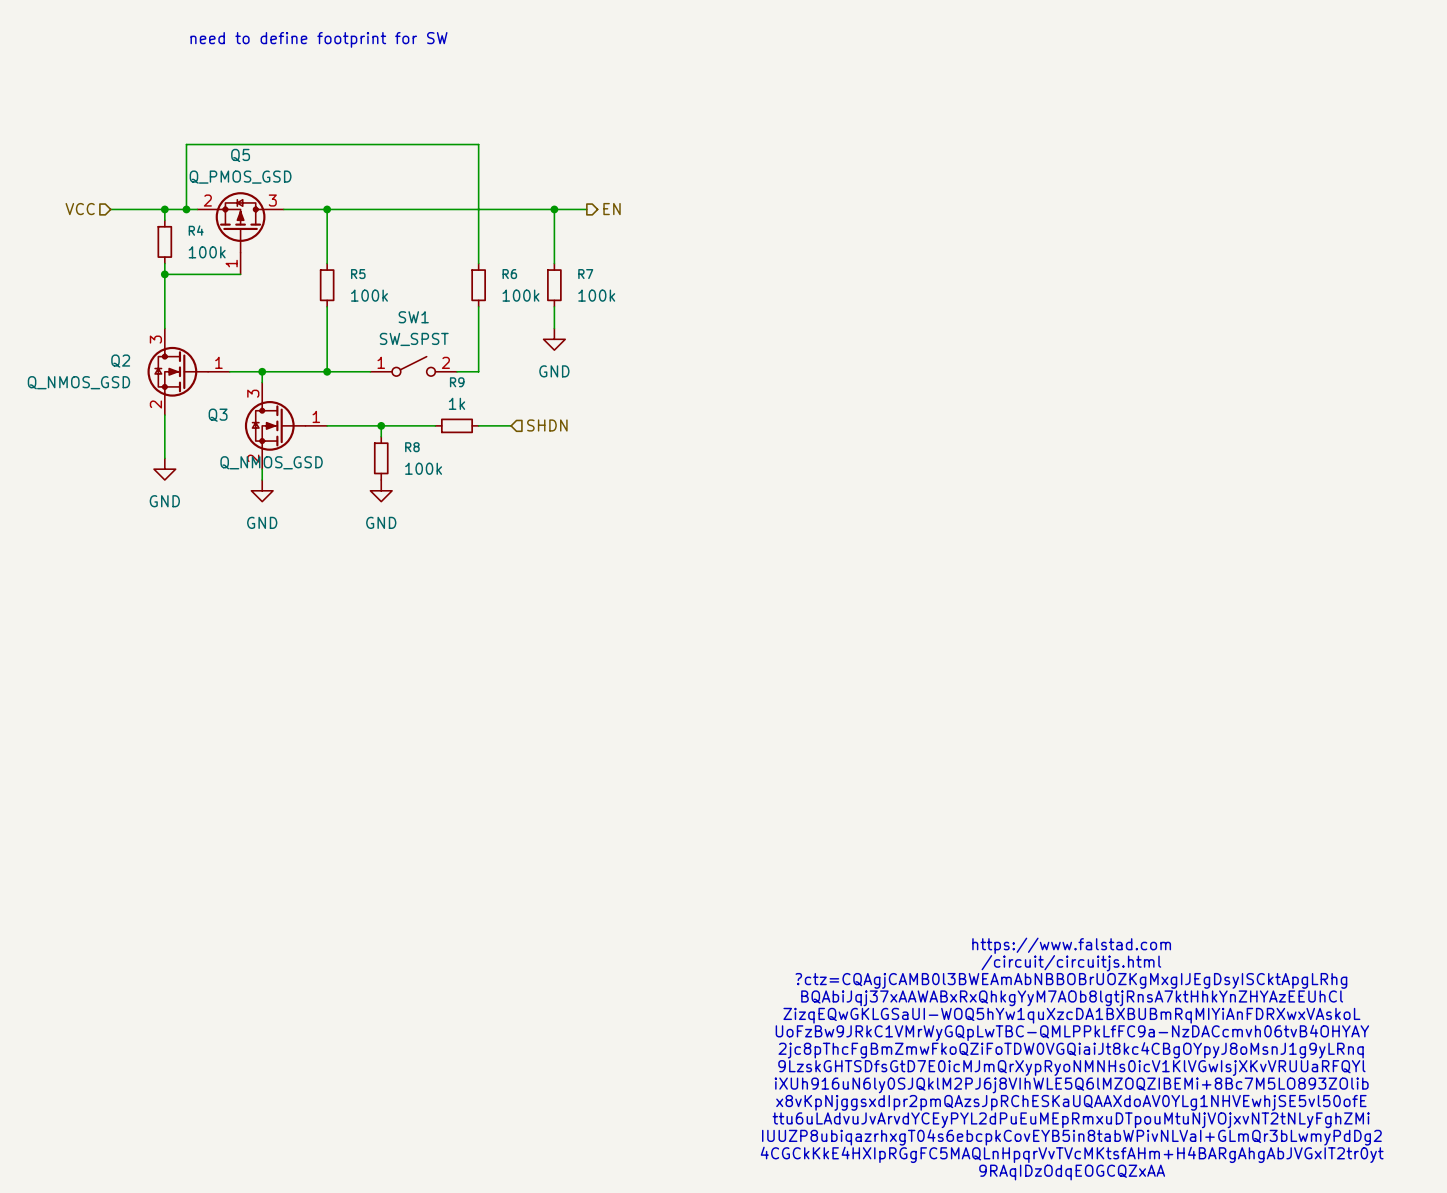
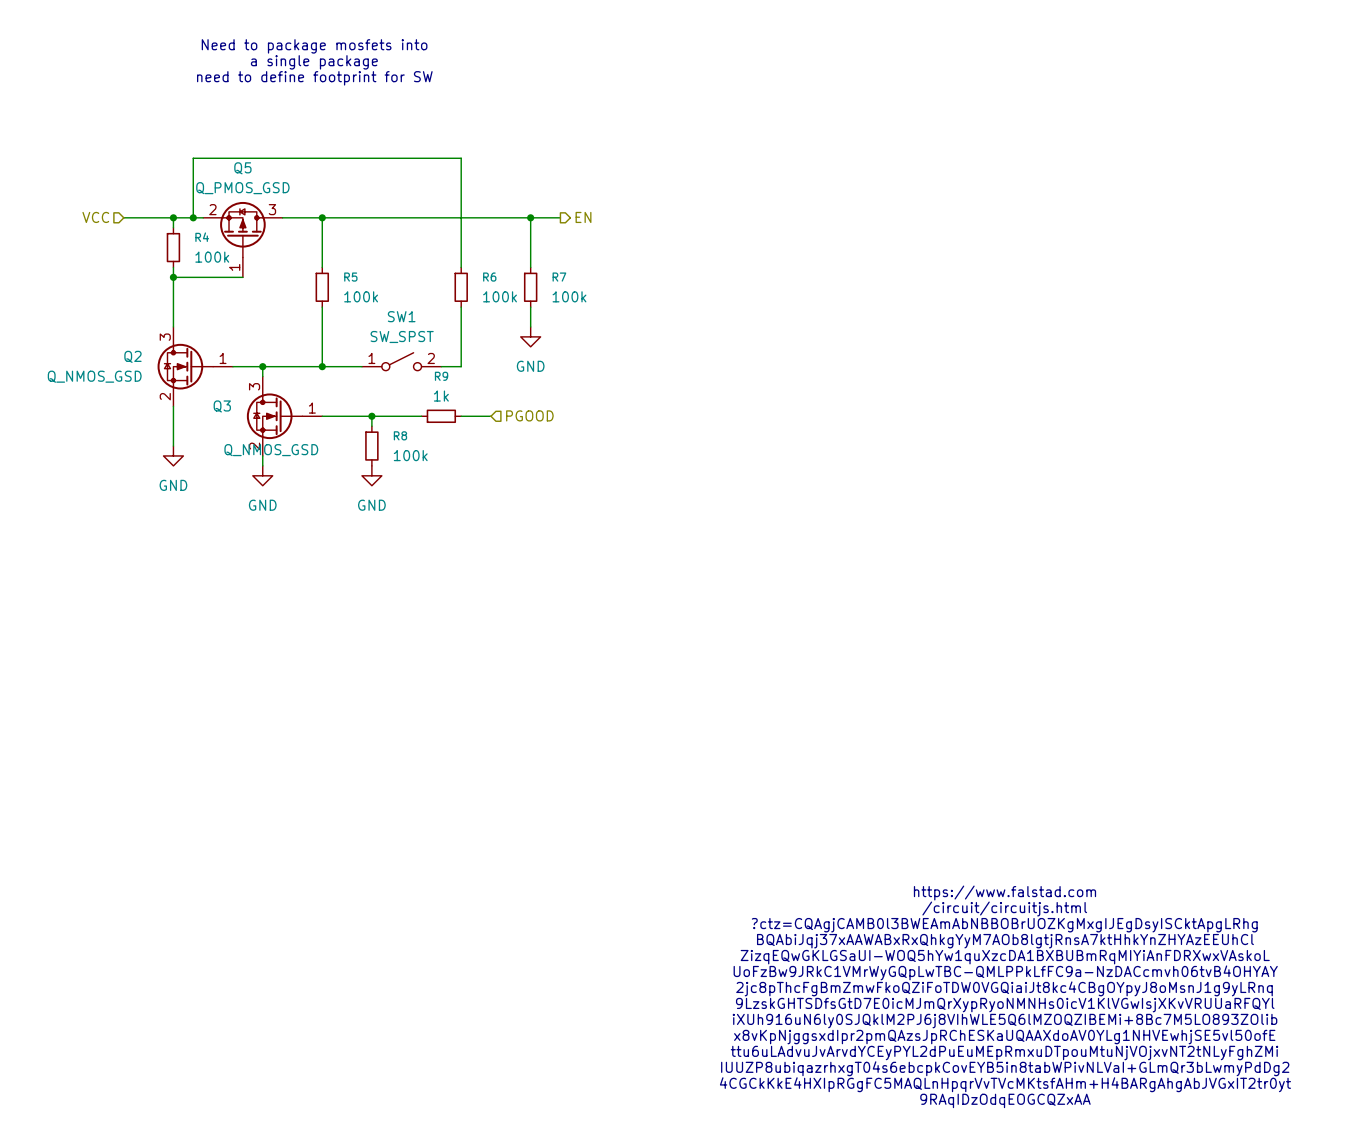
text: none -> Need to package mosfets into (314, 46)
text: need to define footprint for SW (319, 39) -> a single package (314, 62)
text: none -> need to define footprint for SW (314, 78)
hierarchical label: SHDN (547, 425) -> PGOOD (529, 415)

